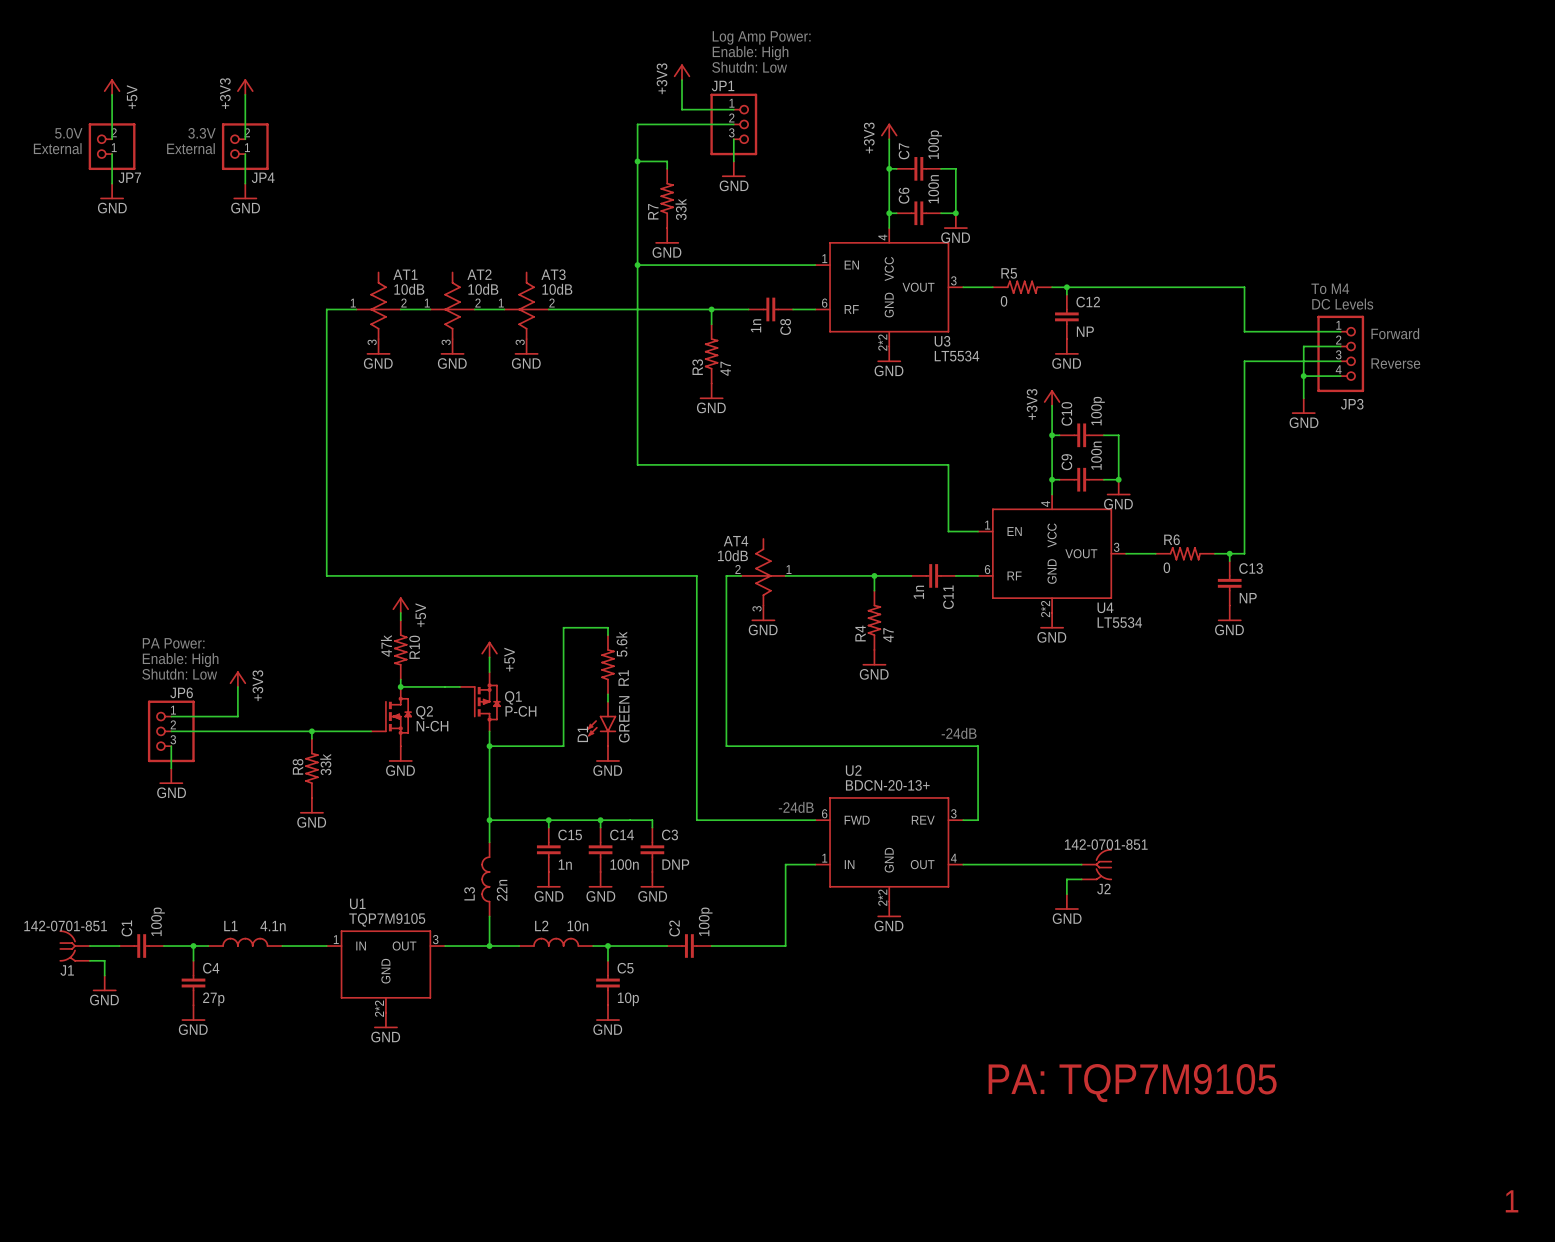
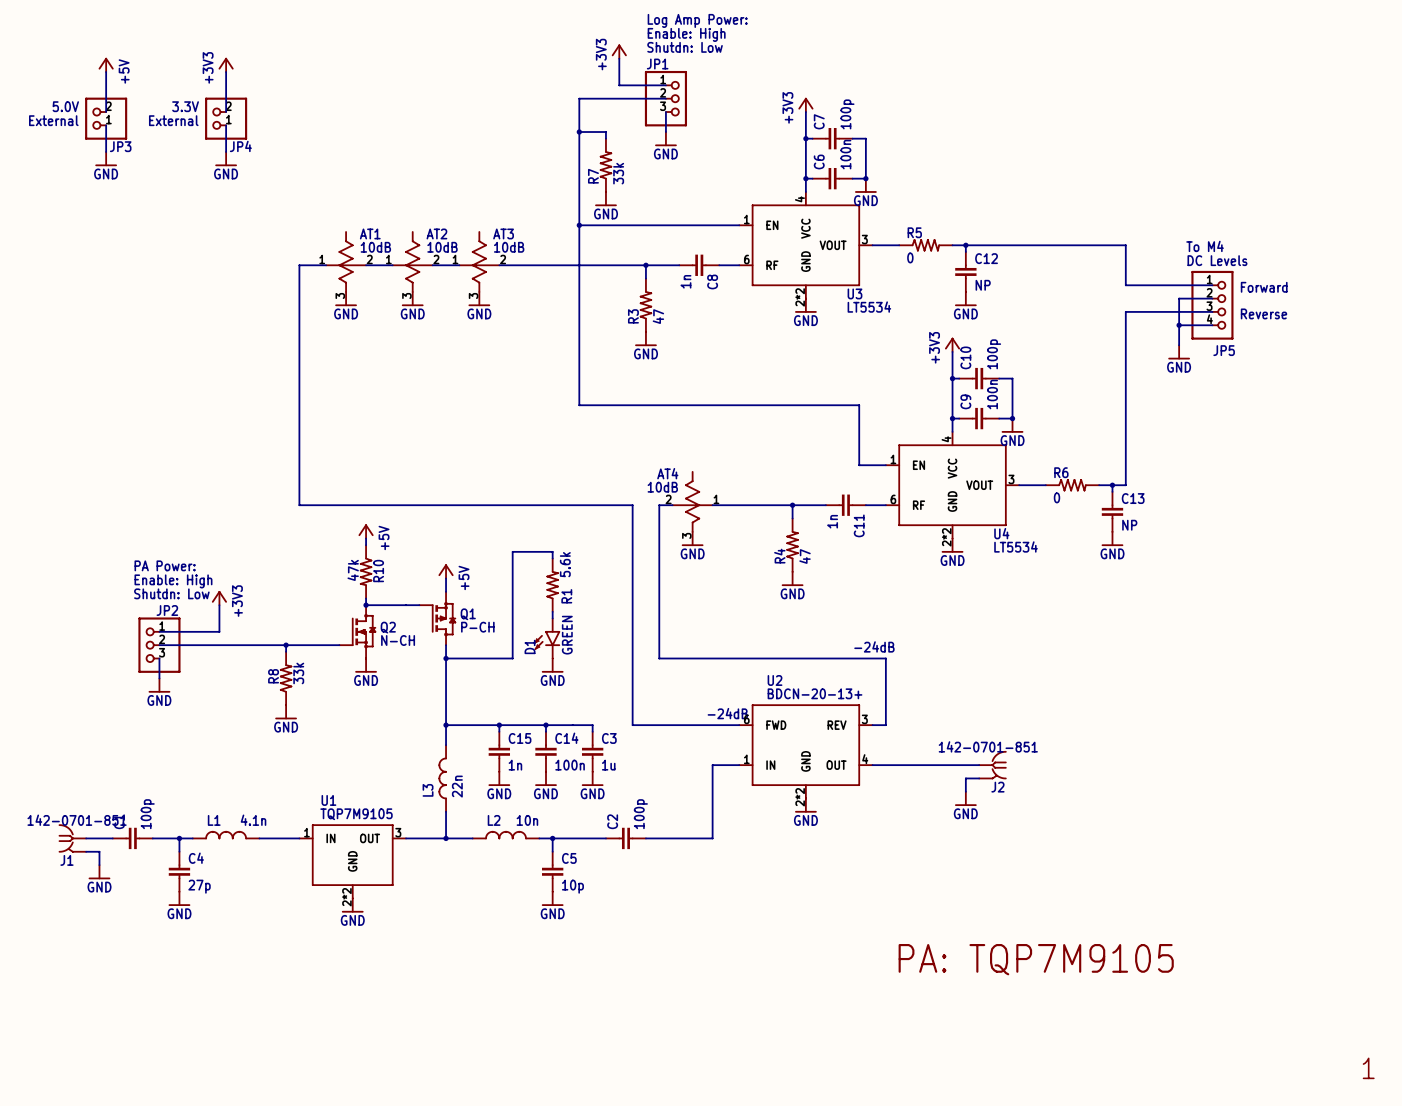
JP7 name: JP7 (129, 177) -> JP3 (120, 146)
JP3 name: JP3 (1352, 404) -> JP5 (1224, 350)
JP6 name: JP6 (181, 692) -> JP2 (167, 610)
C3 value: DNP (675, 864) -> 1u (608, 765)

